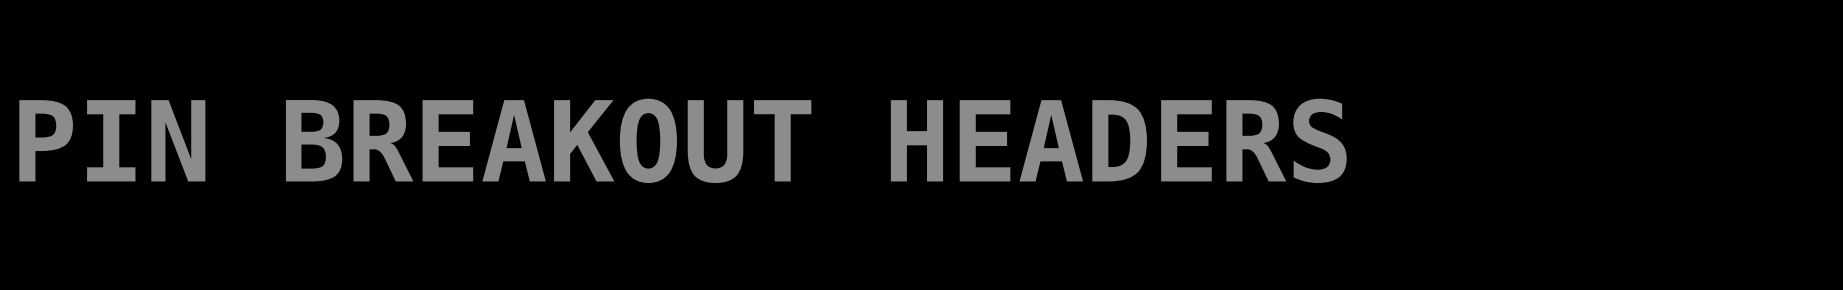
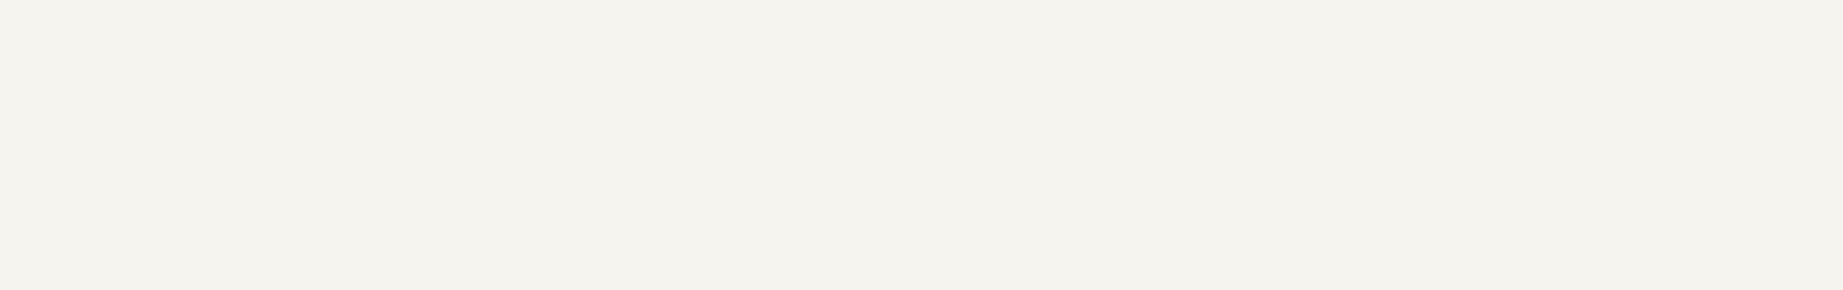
text: PIN BREAKOUT HEADERS (683, 140) -> none

